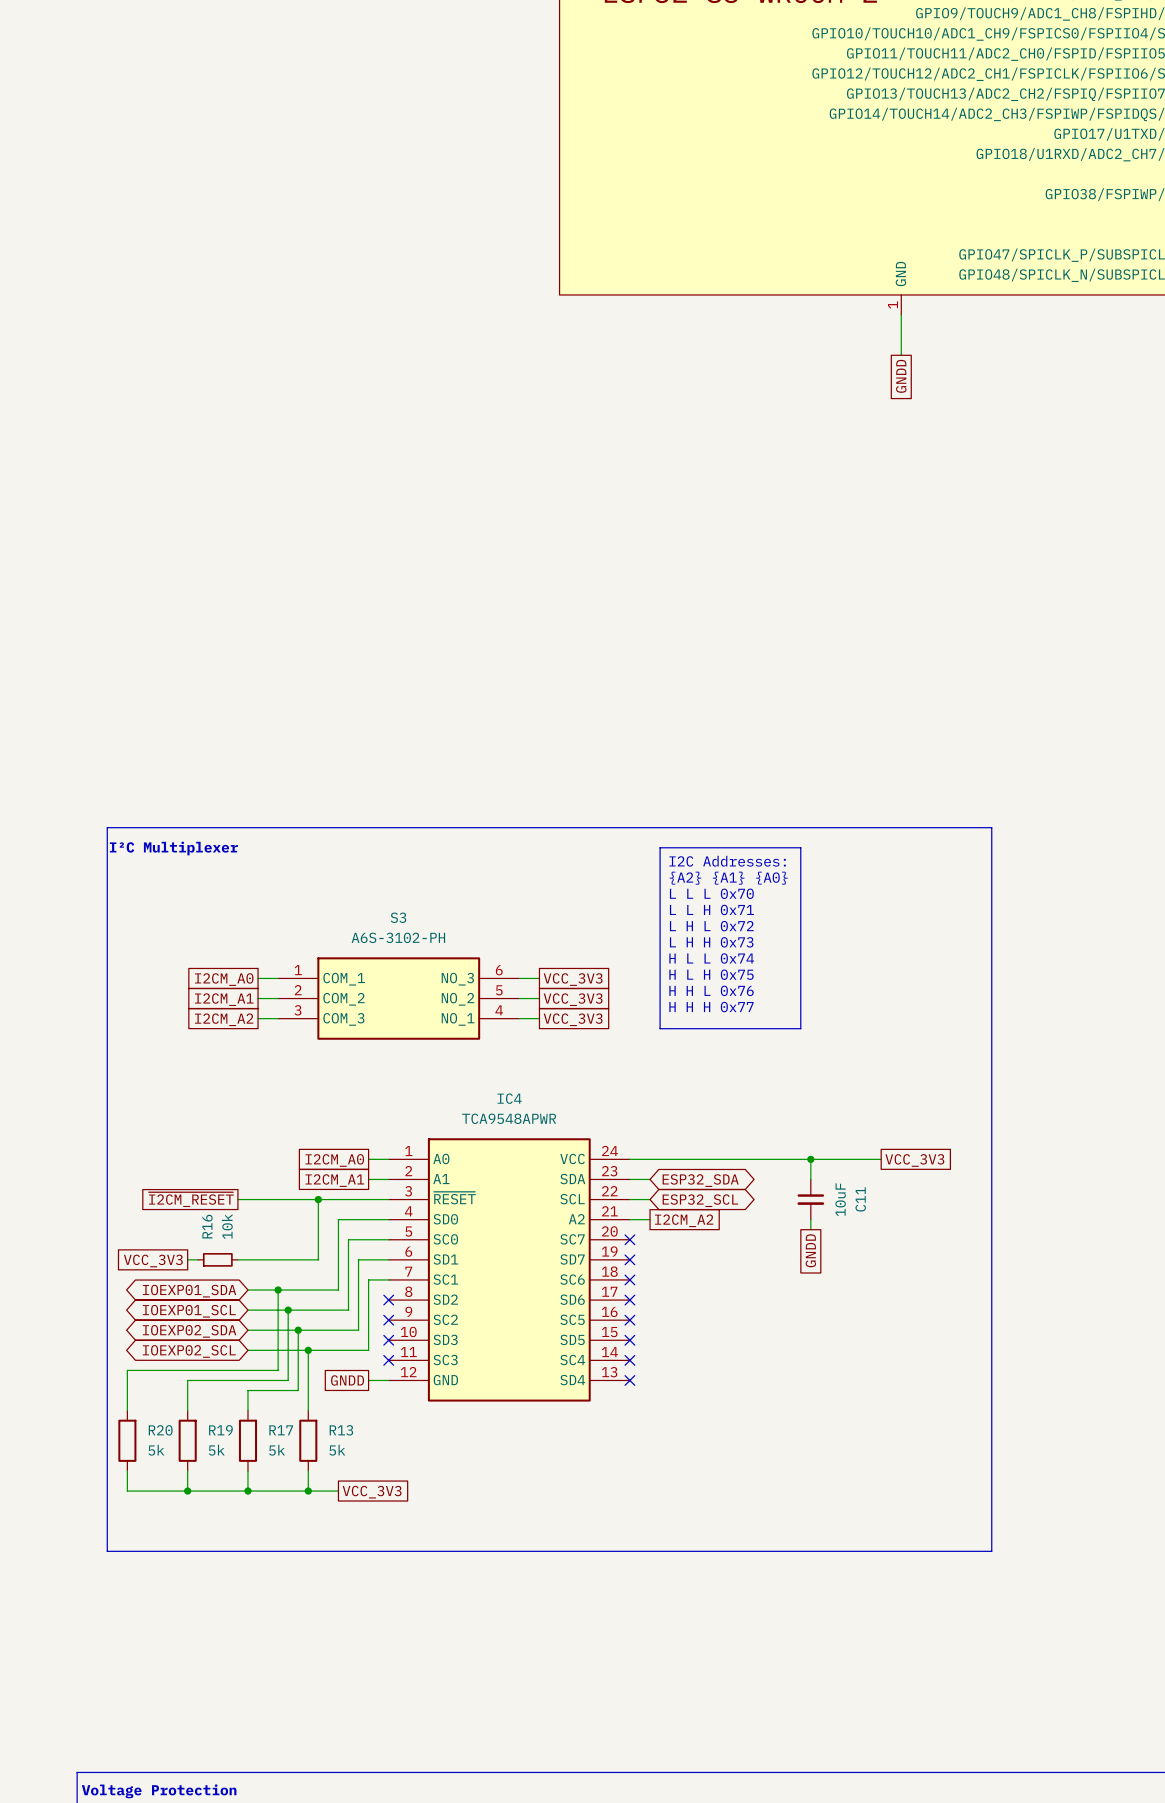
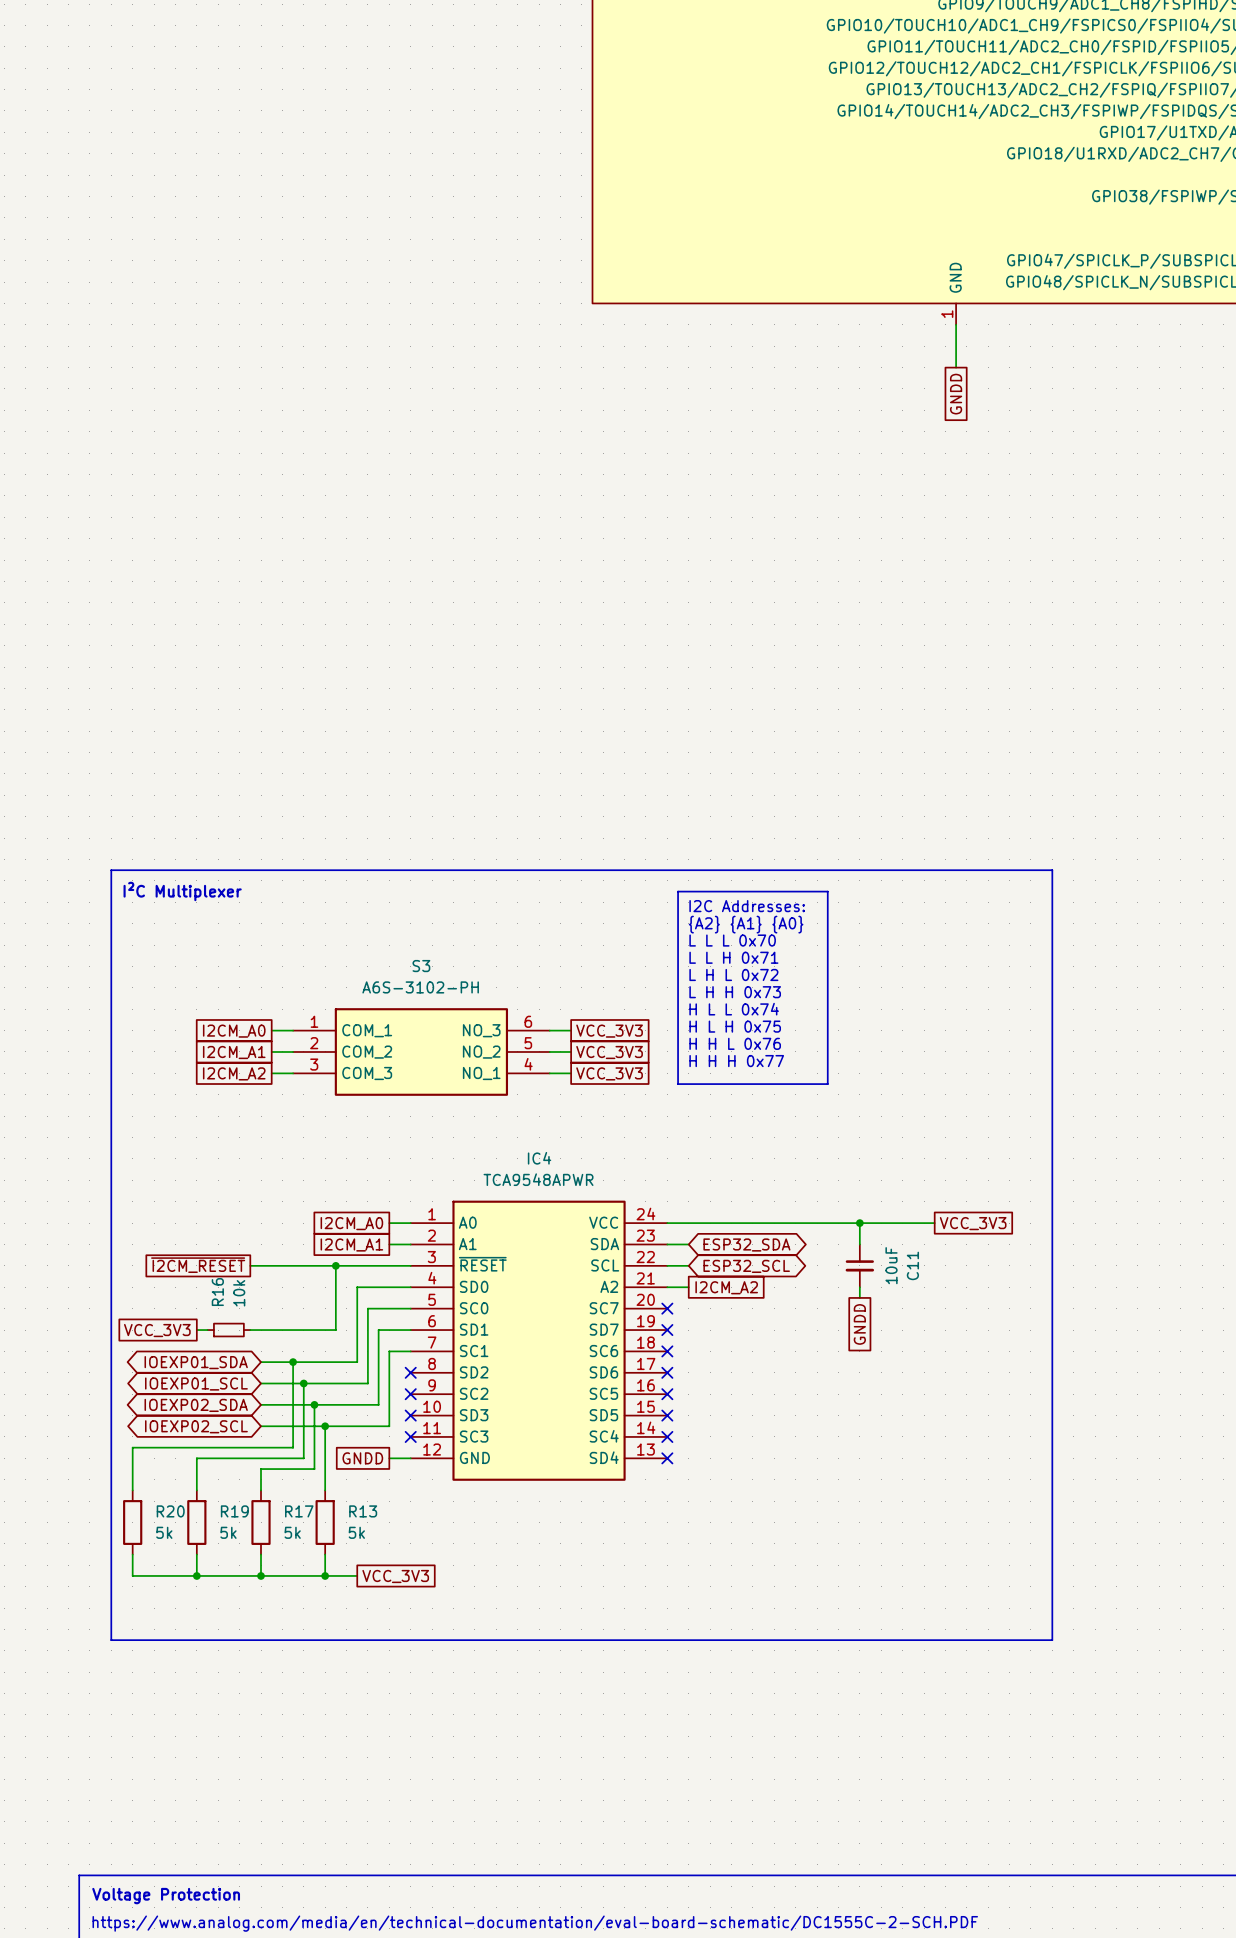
line: (660, 847) (660, 1028) -> (699, 891) (678, 891) (678, 1084) (699, 1084)
line: (780, 847) (800, 847) (800, 1028) (780, 1028) -> (827, 891) (827, 1084)
text position: I2C Addresses: (727, 861) -> I2C Addresses: (747, 906)
text position: {A2} {A1} {A0} (728, 878) -> {A2} {A1} {A0} (746, 924)
text position: L L L 0x70 (711, 893) -> L L L 0x70 (732, 940)
text position: L L H 0x71 (711, 909) -> L L H 0x71 (733, 957)
text position: L H L 0x72 (711, 926) -> L H L 0x72 (733, 974)
text position: L H H 0x73 (711, 942) -> L H H 0x73 (735, 992)
text position: H L L 0x74 (711, 958) -> H L L 0x74 (734, 1009)
text position: H L H 0x75 (711, 974) -> H L H 0x75 (735, 1026)
text position: H H L 0x76 (711, 990) -> H H L 0x76 (735, 1043)
text position: H H H 0x77 (711, 1007) -> H H H 0x77 (736, 1061)

